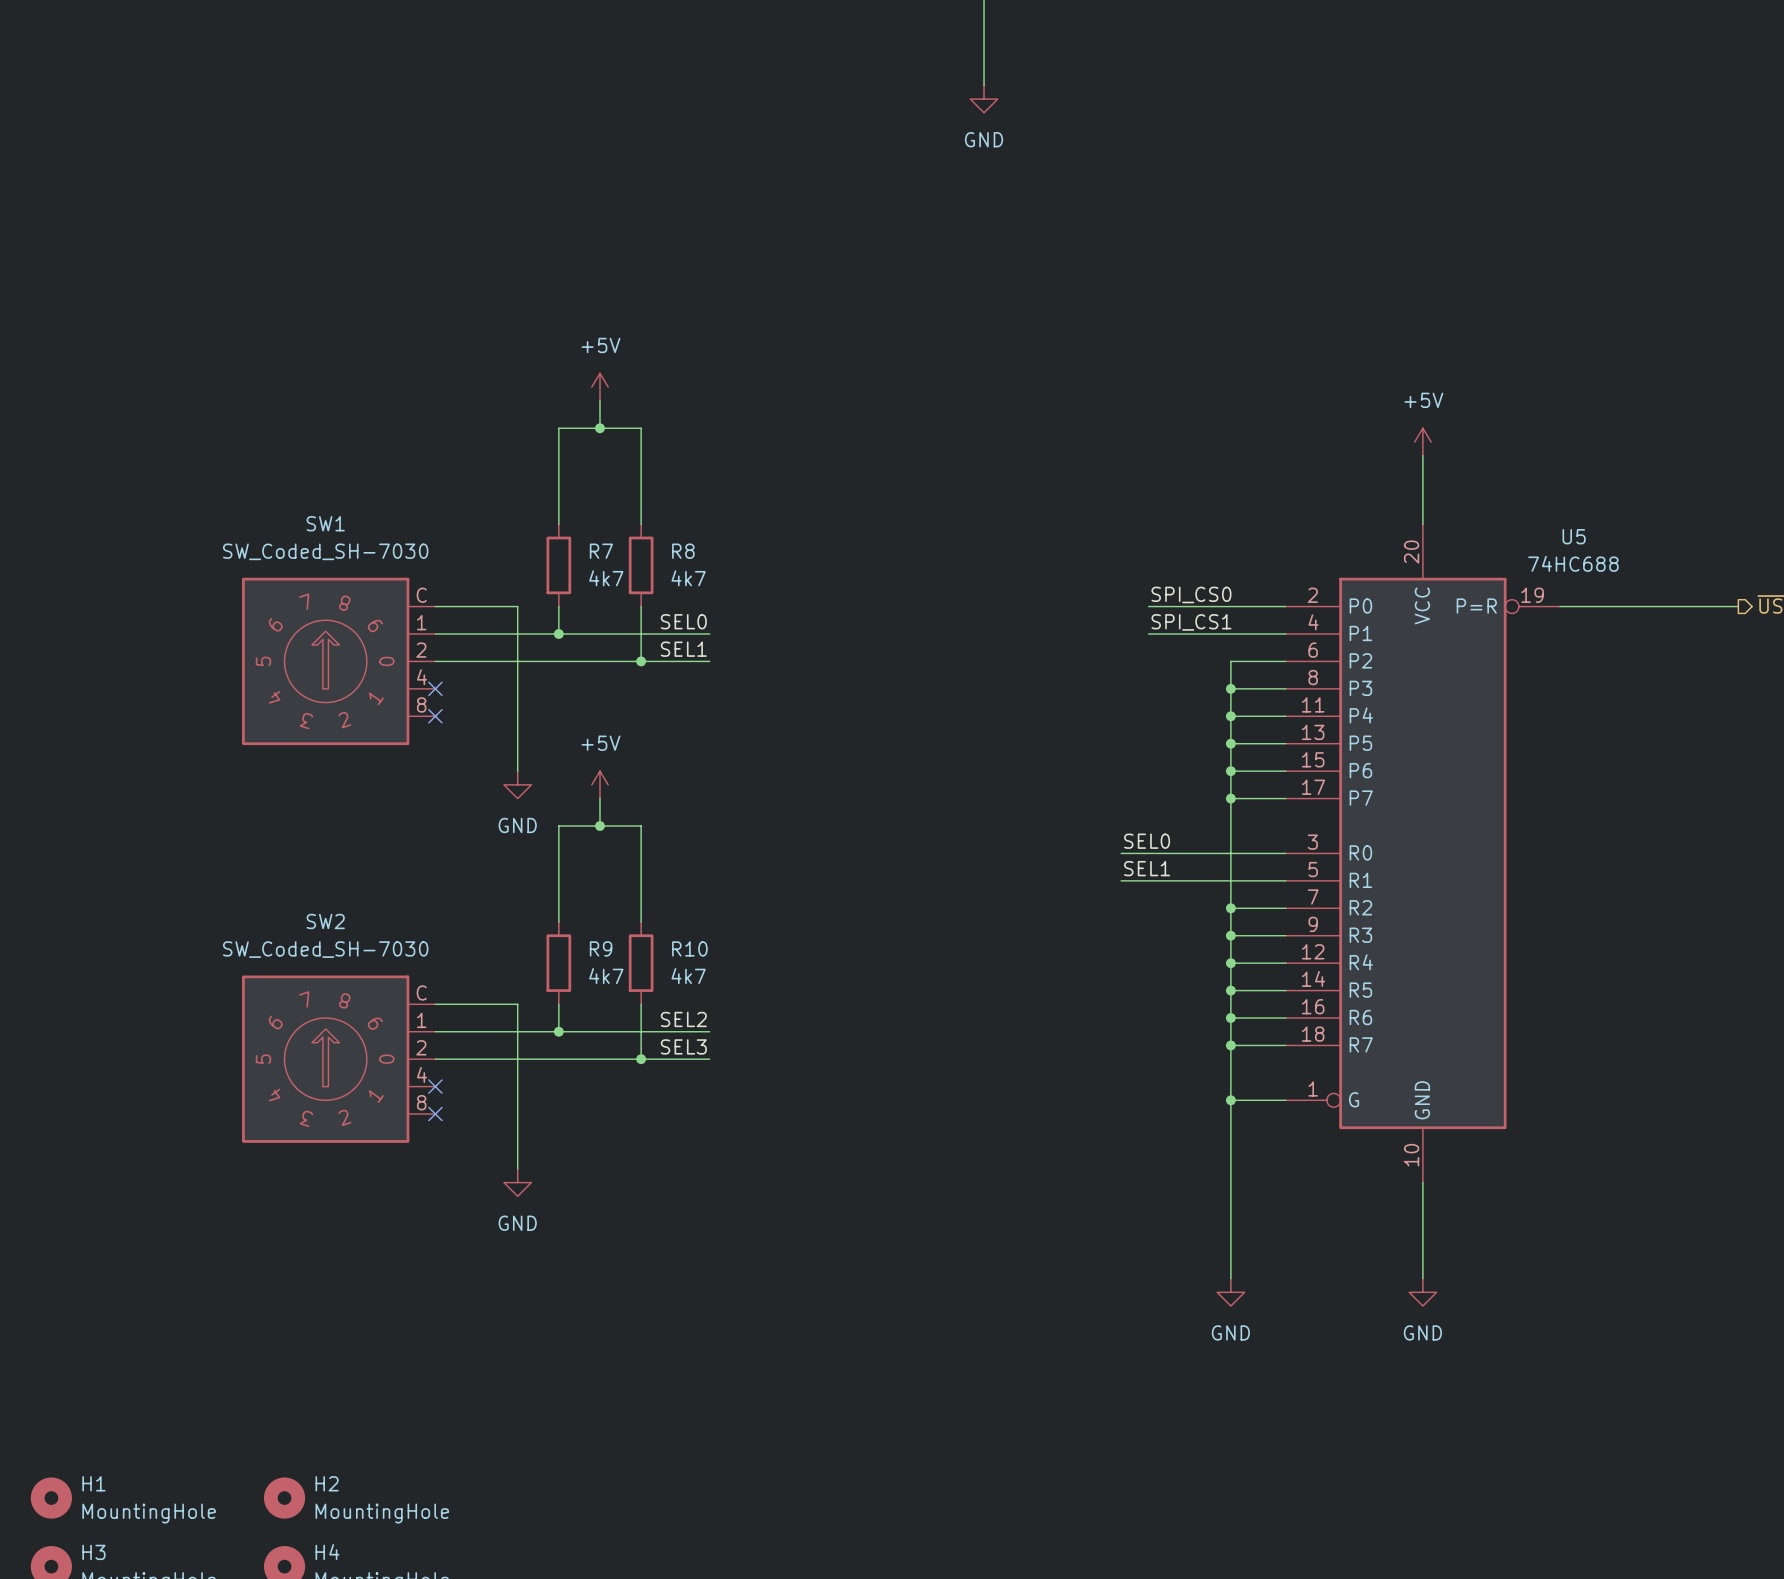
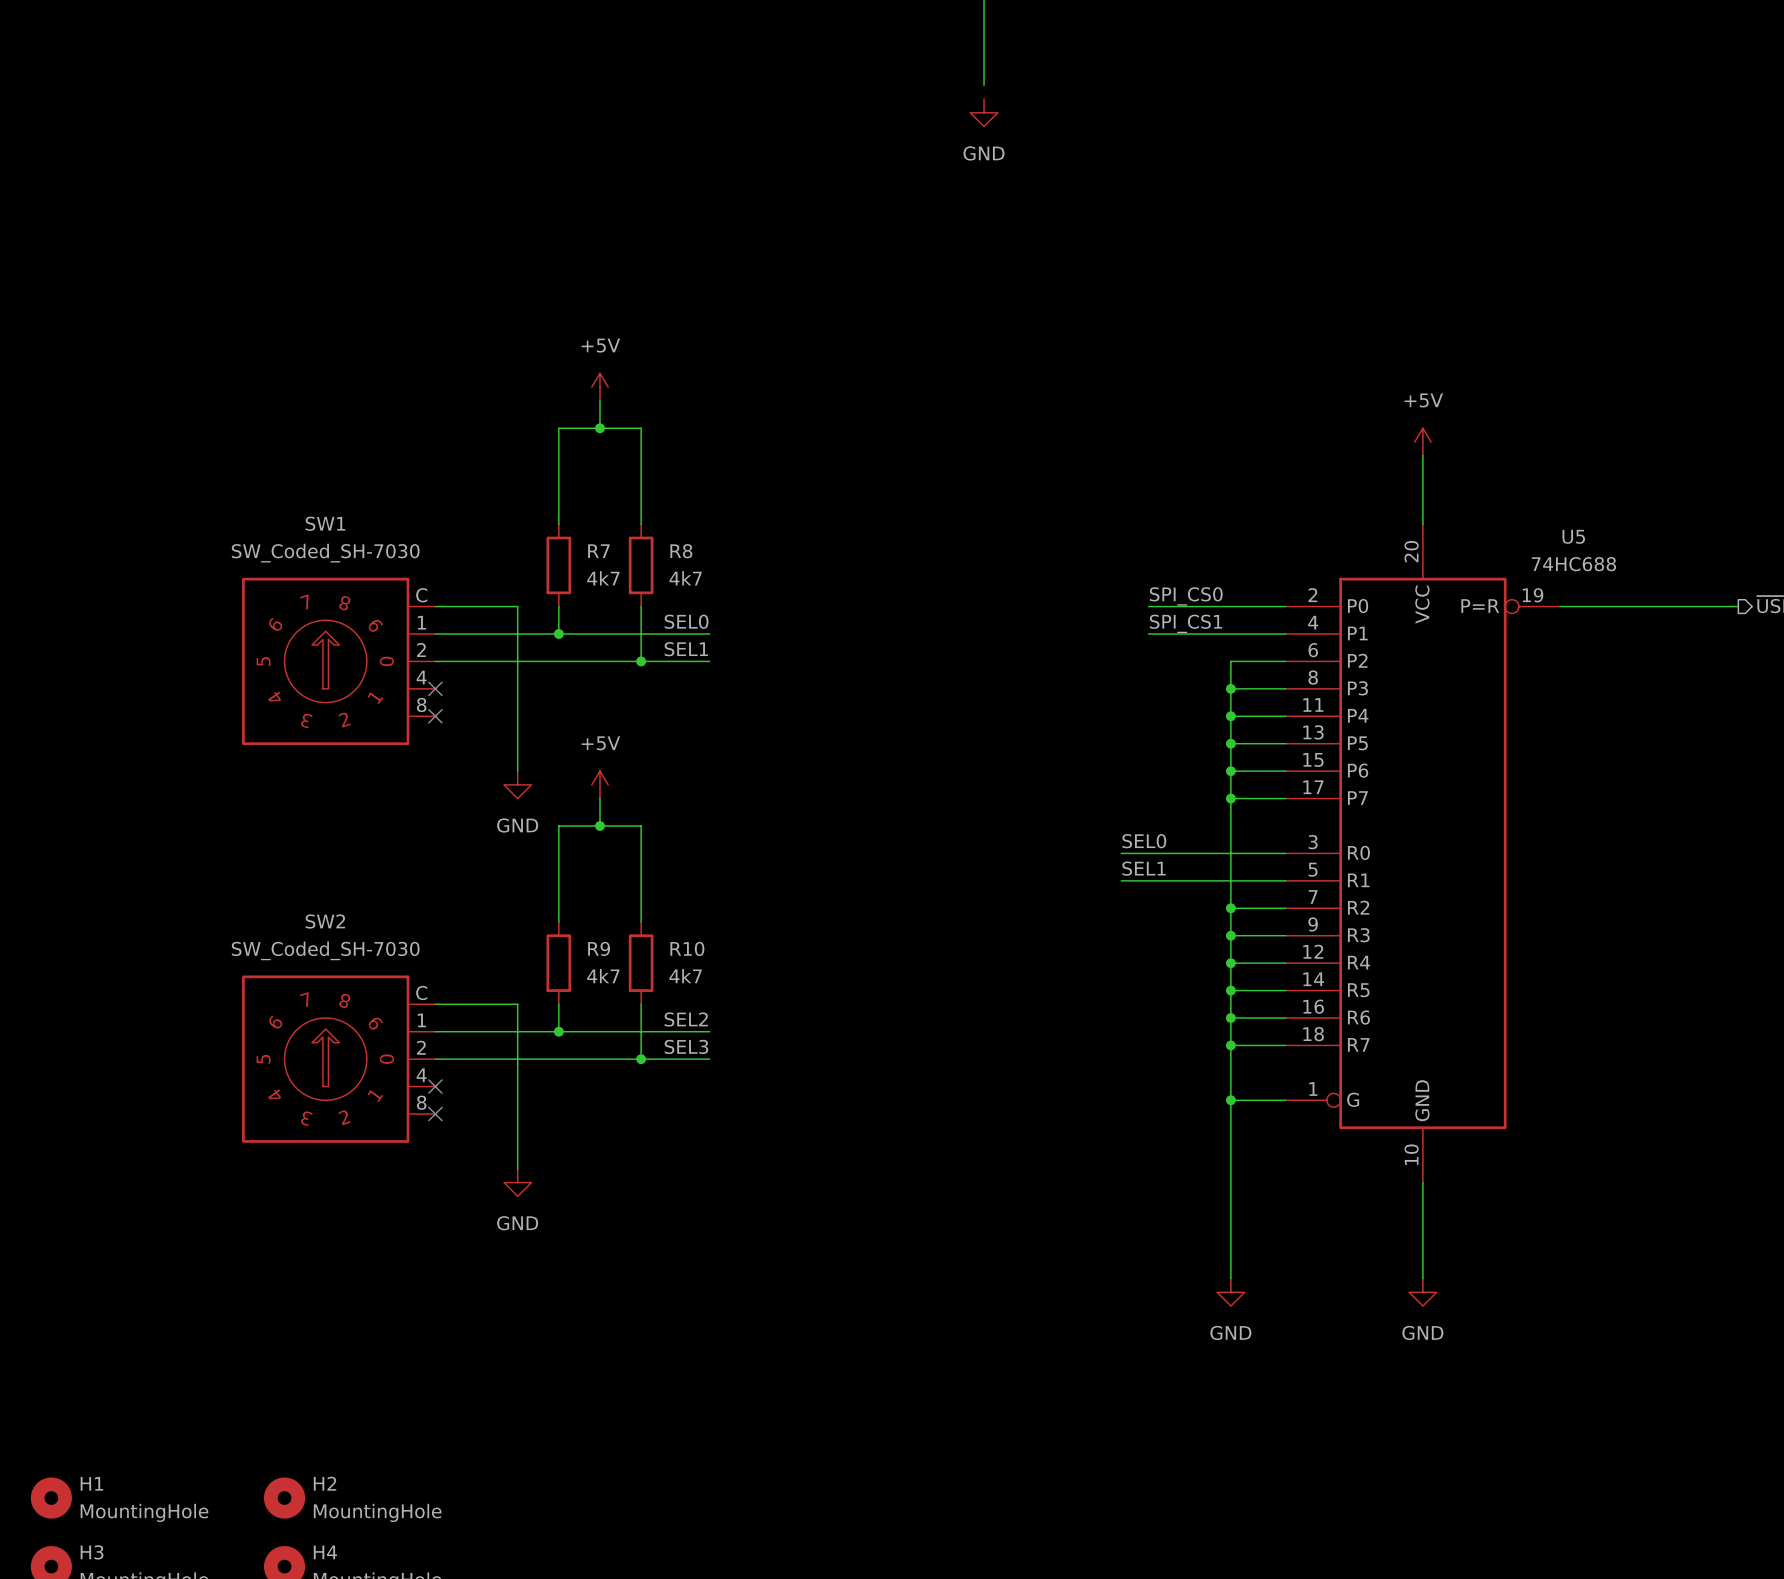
power symbol position: GND (984, 99) -> GND (984, 112)

